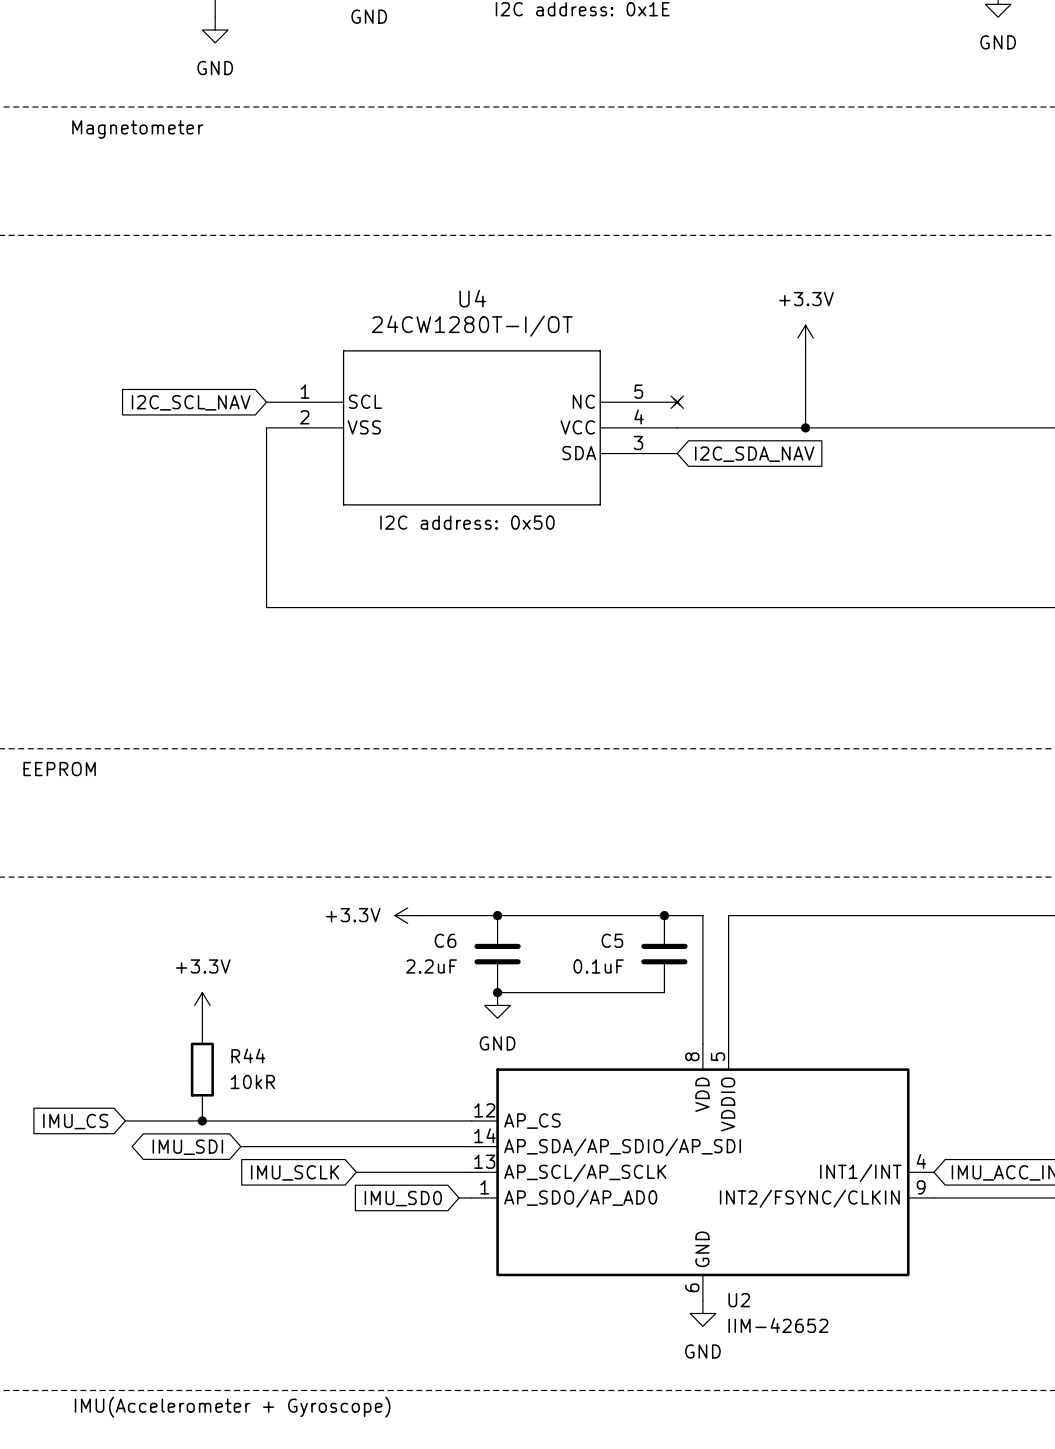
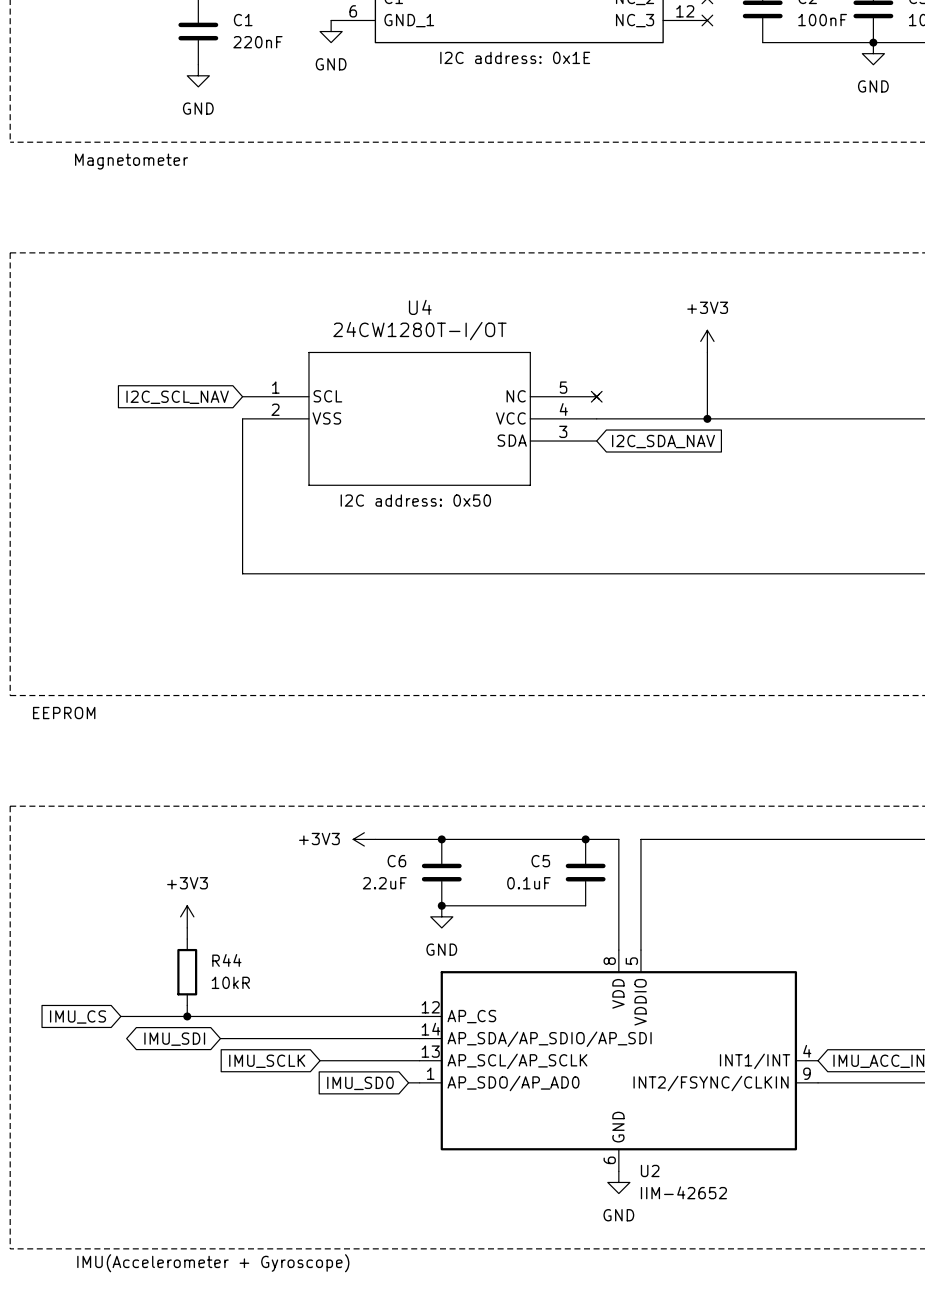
power symbol: +3.3V (805, 338) -> +3V3 (707, 341)
power symbol: +3.3V (407, 915) -> +3V3 (364, 839)
power symbol: +3.3V (202, 1005) -> +3V3 (187, 916)

